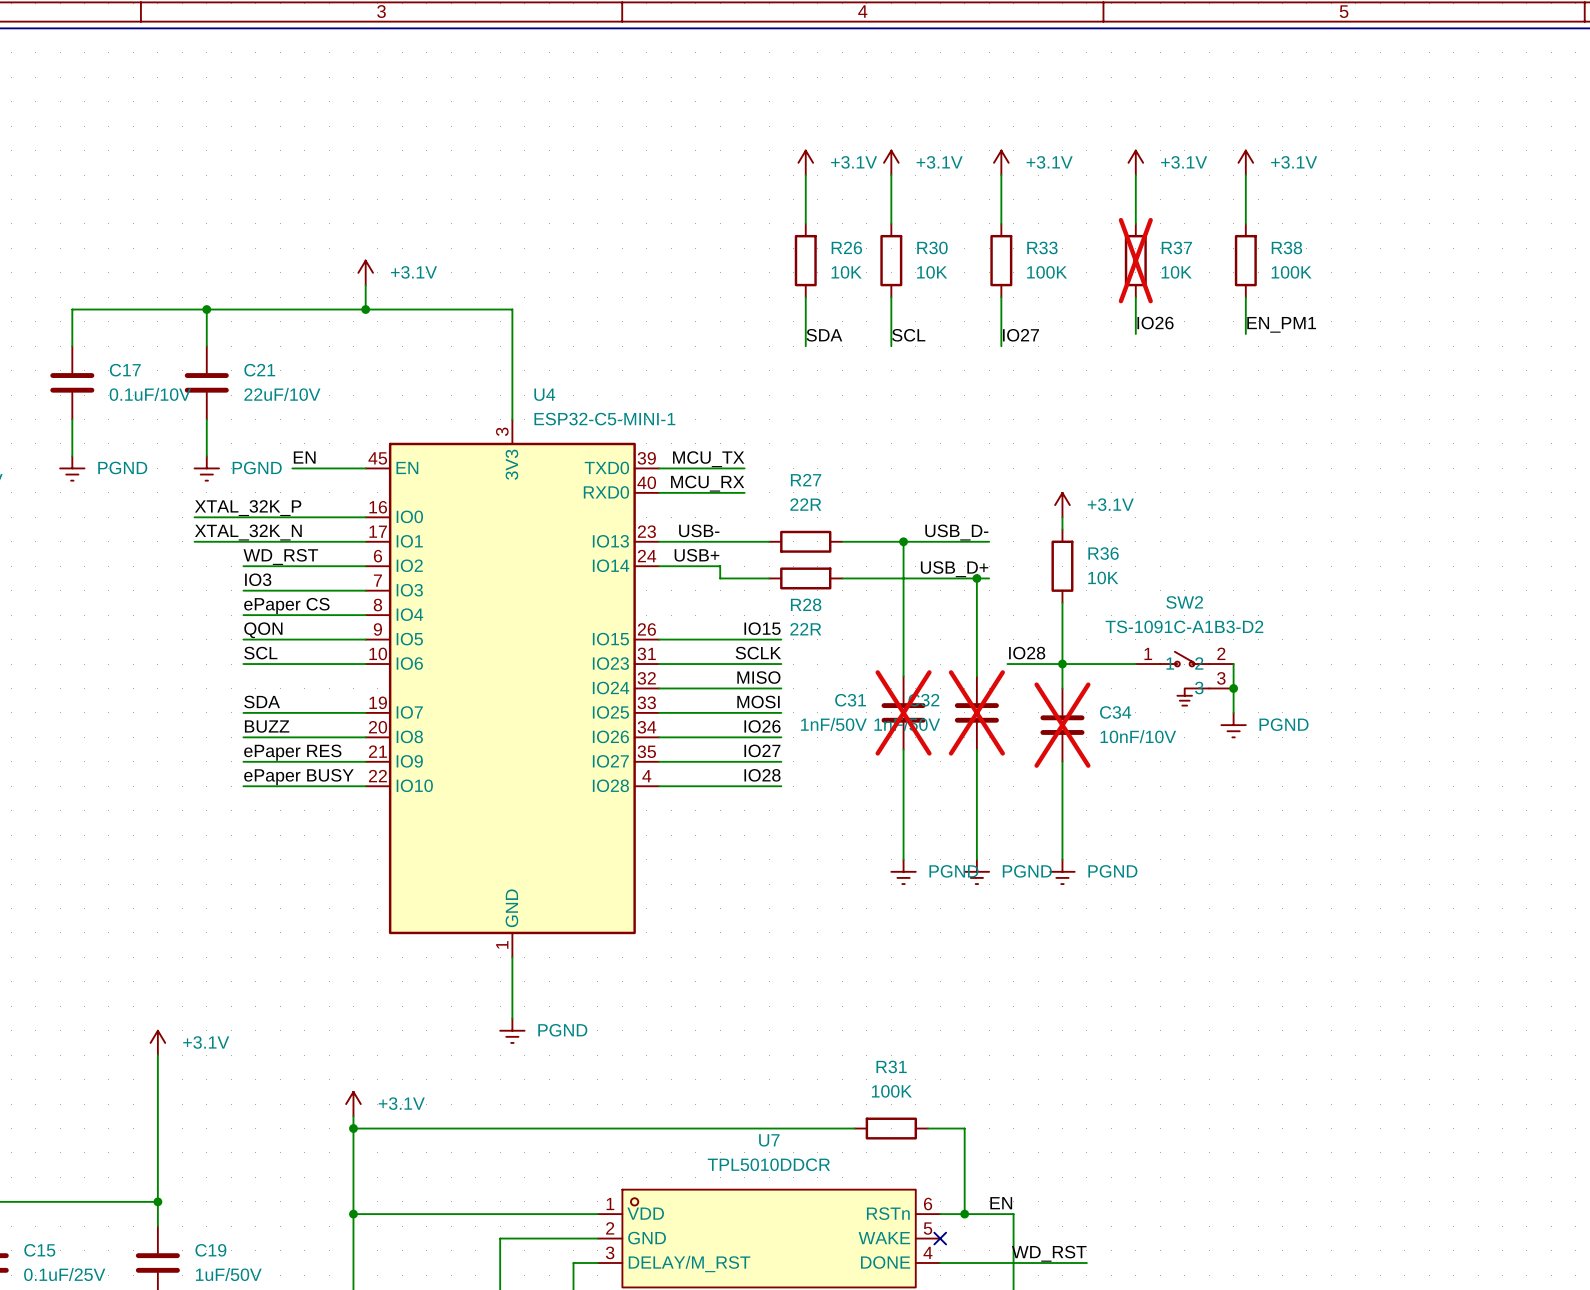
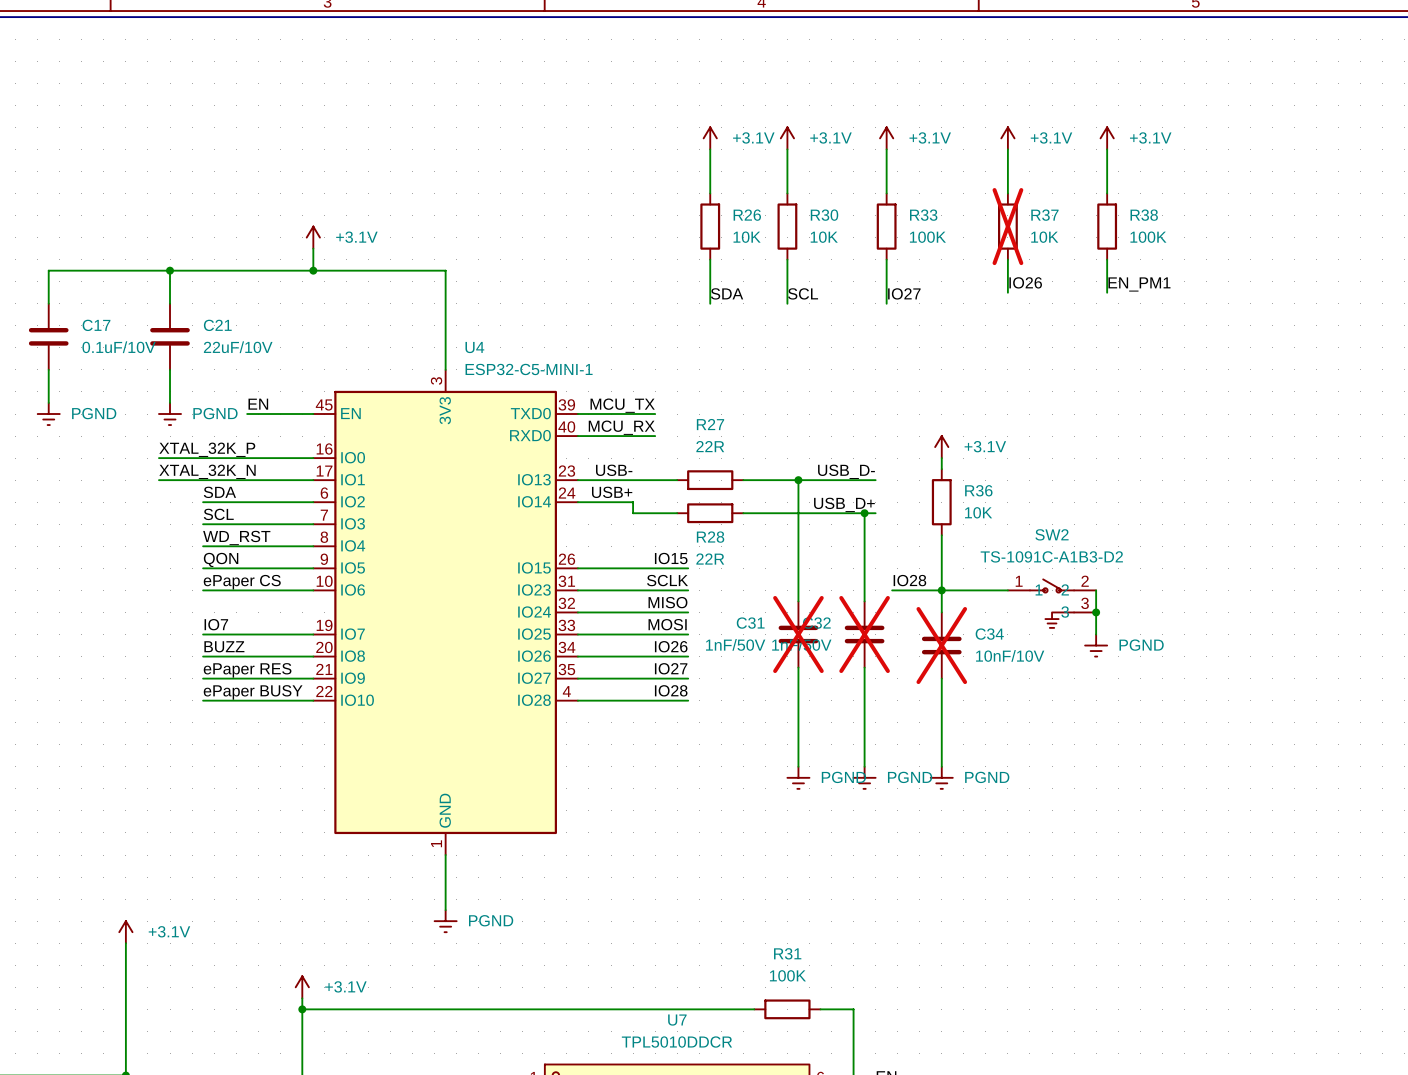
label: WD_RST (280, 556) -> SDA (219, 492)
label: IO3 (258, 579) -> SCL (218, 514)
label: ePaper CS (286, 605) -> WD_RST (236, 537)
label: SCL (260, 653) -> ePaper CS (242, 582)
label: SDA (262, 702) -> IO7 (216, 624)

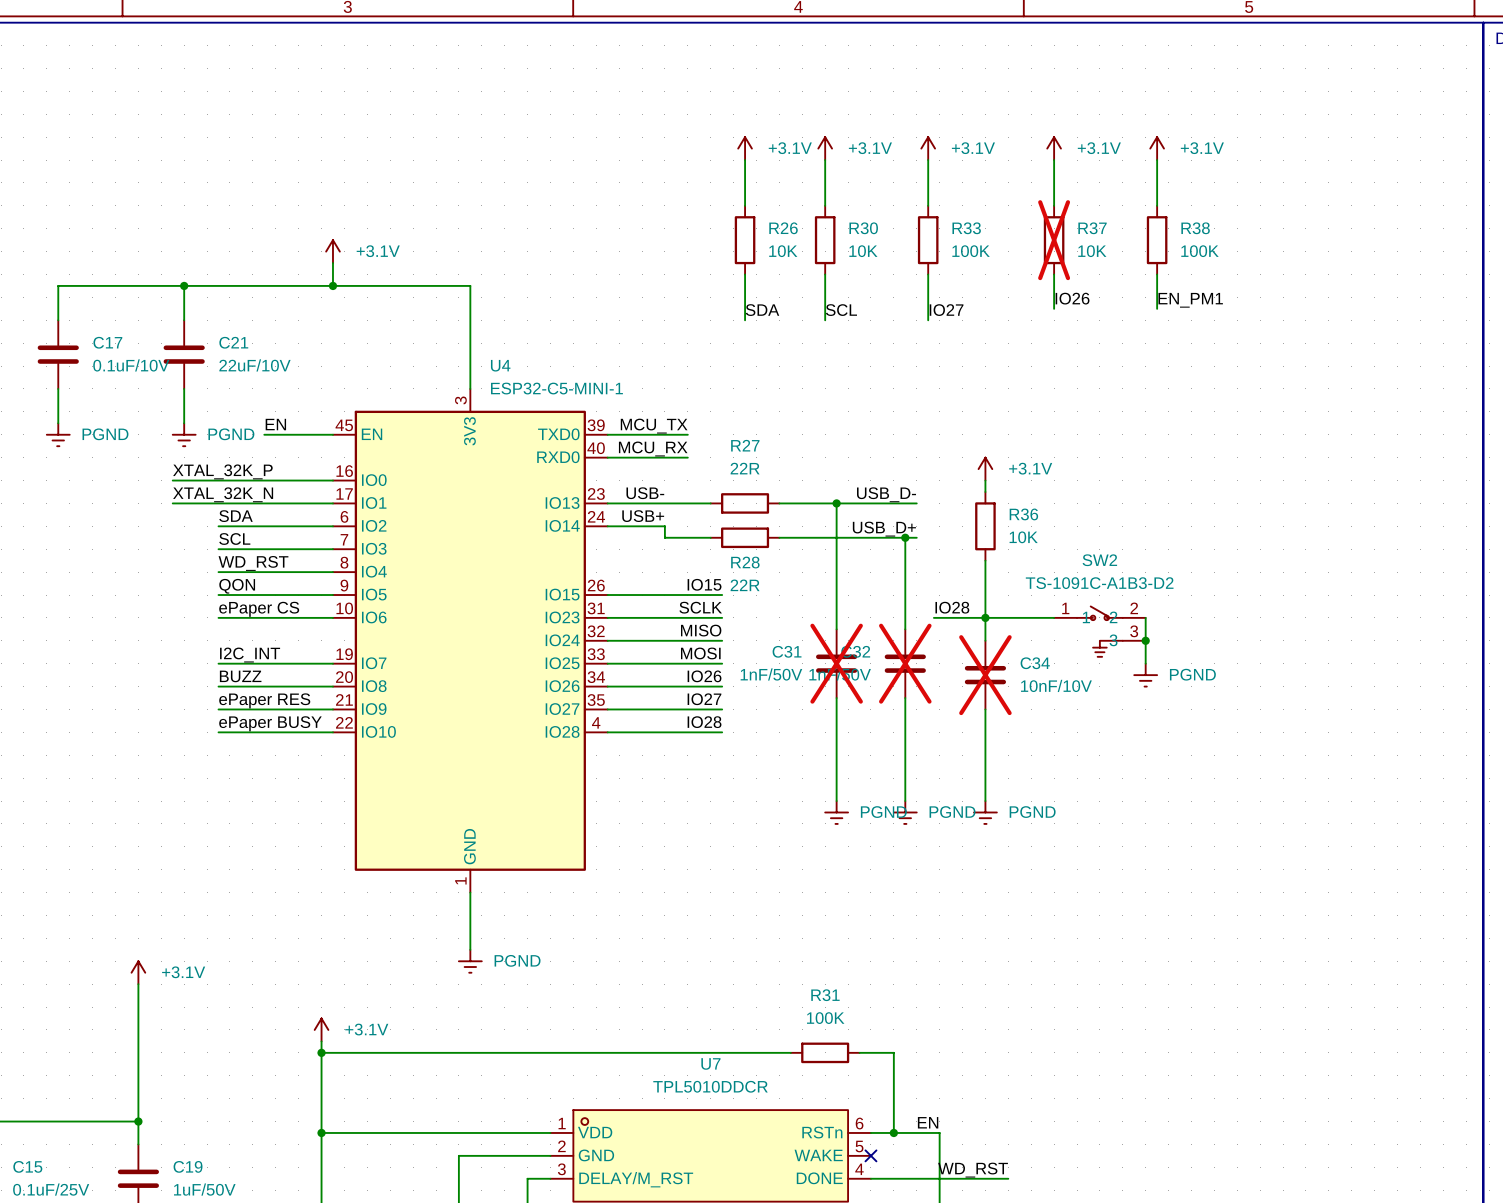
label: IO7 (216, 624) -> I2C_INT (250, 655)

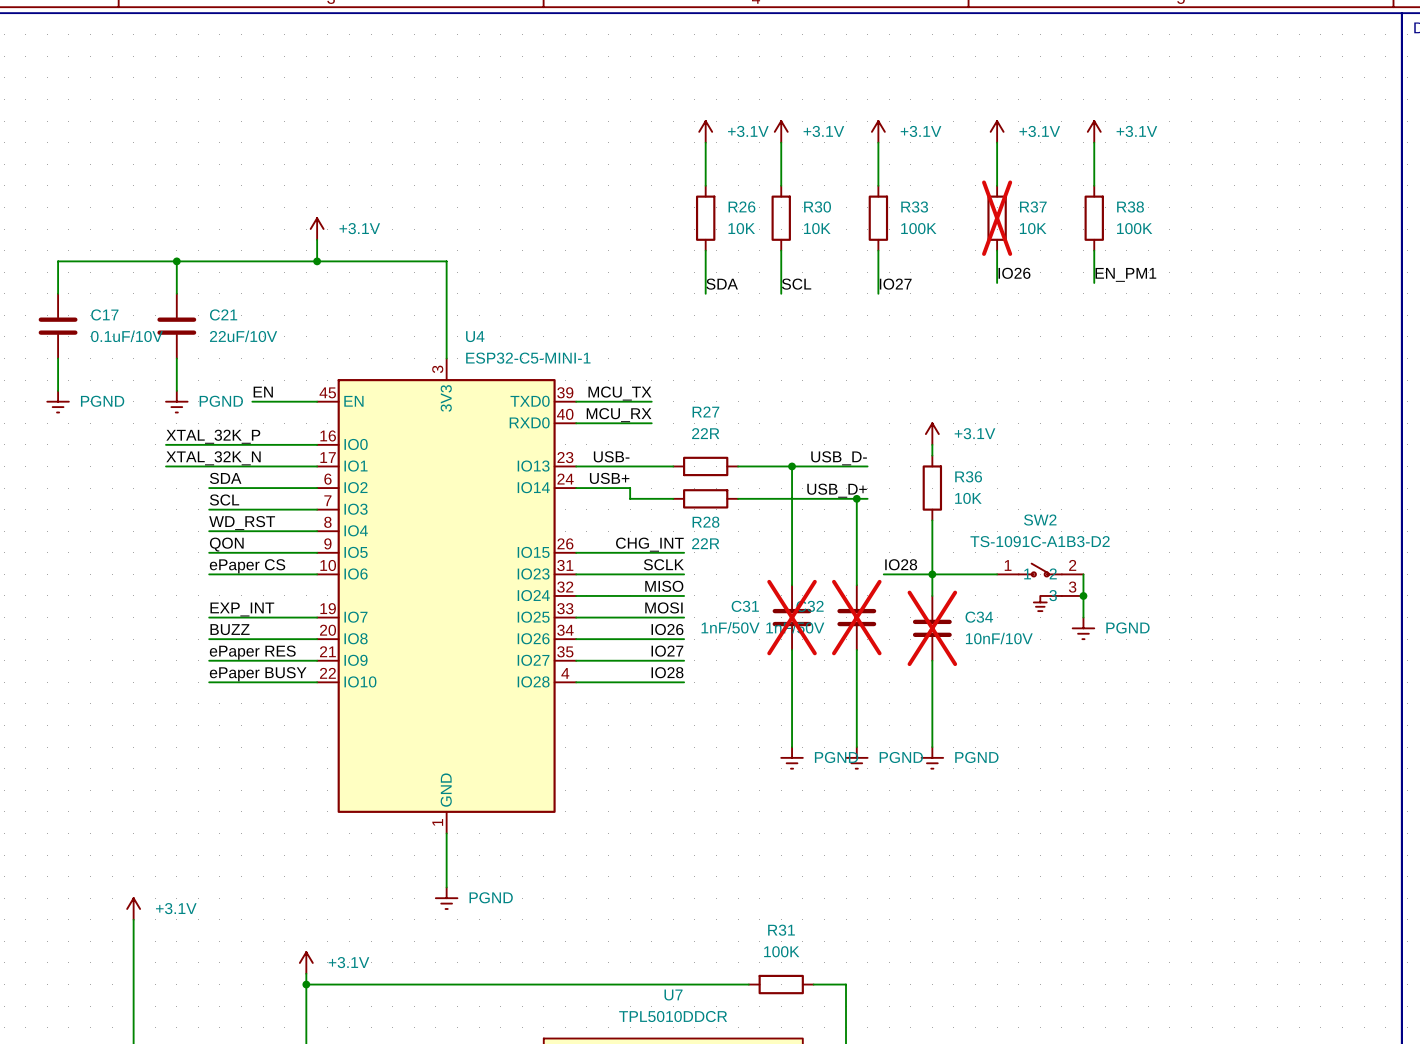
label: IO15 (704, 584) -> CHG_INT (649, 544)
label: I2C_INT (250, 655) -> EXP_INT (242, 609)

